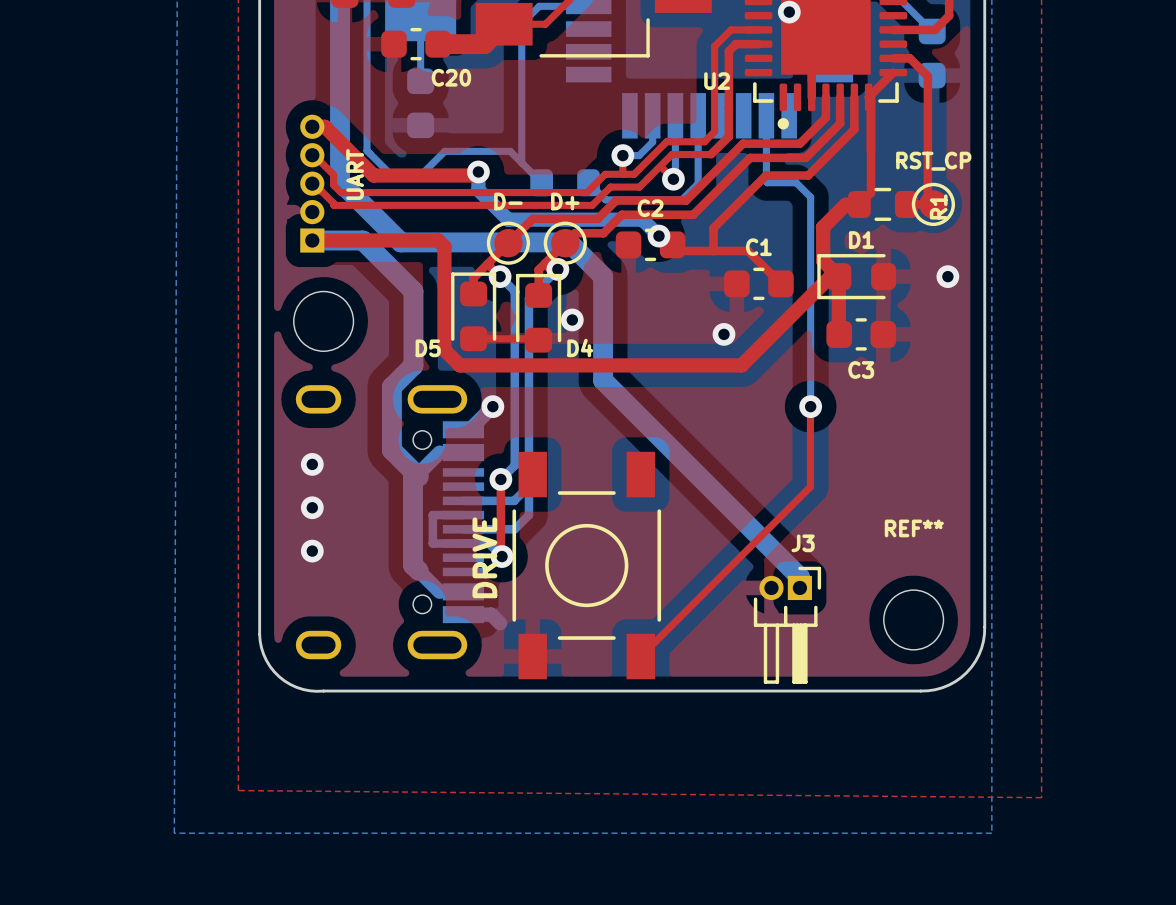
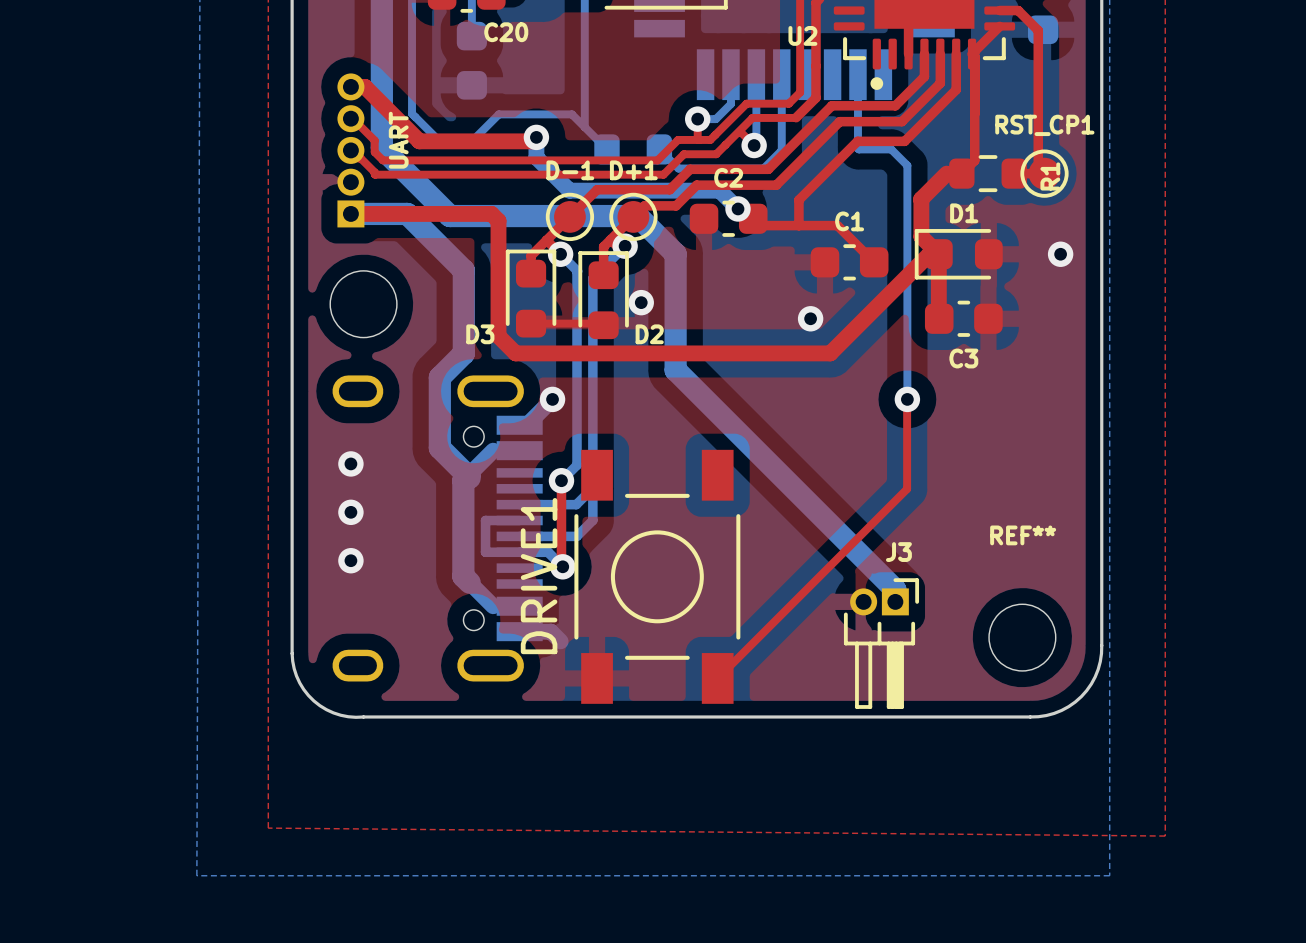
RST_CP name: RST_CP (933, 161) -> RST_CP1 (1044, 125)
D- name: D- (508, 201) -> D-1 (570, 170)
D+ name: D+ (565, 201) -> D+1 (633, 170)
D4 name: D4 (580, 347) -> D2 (649, 334)
D5 name: D5 (428, 348) -> D3 (480, 334)
DRIVE name: DRIVE (484, 557) -> DRIVE1 (539, 576)

